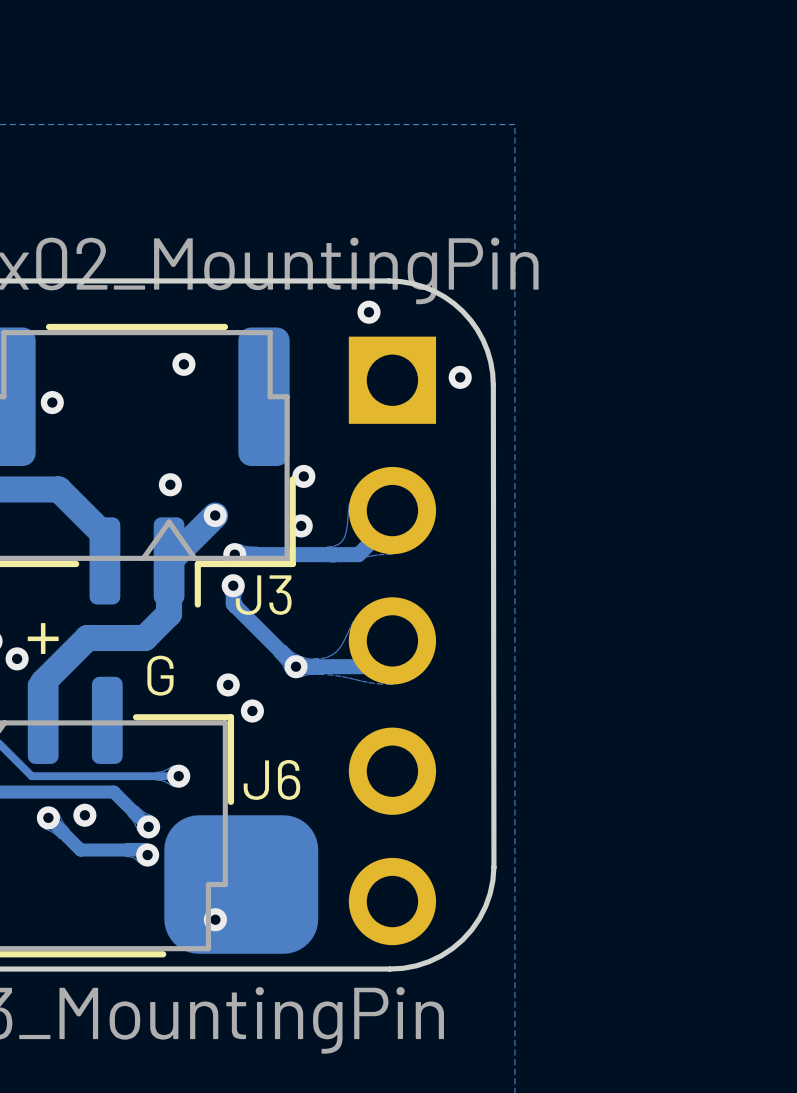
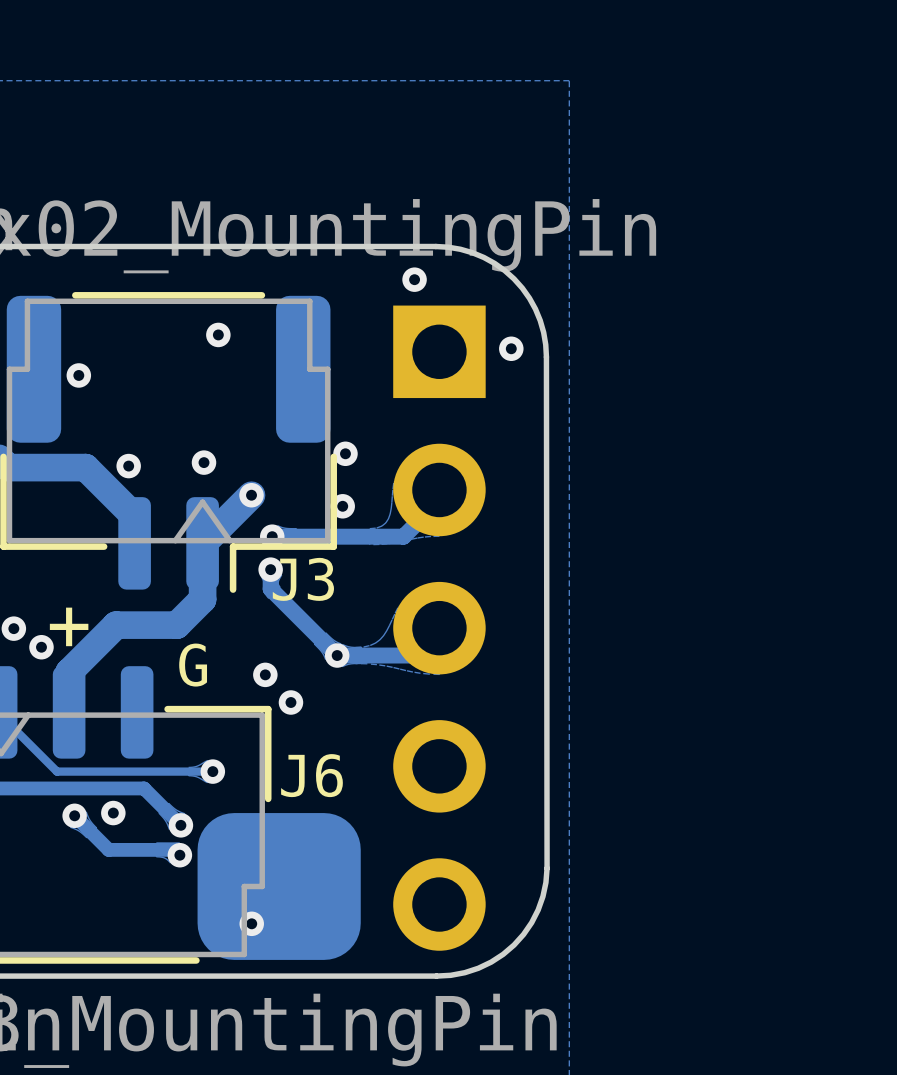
via: none -> (128, 466)

